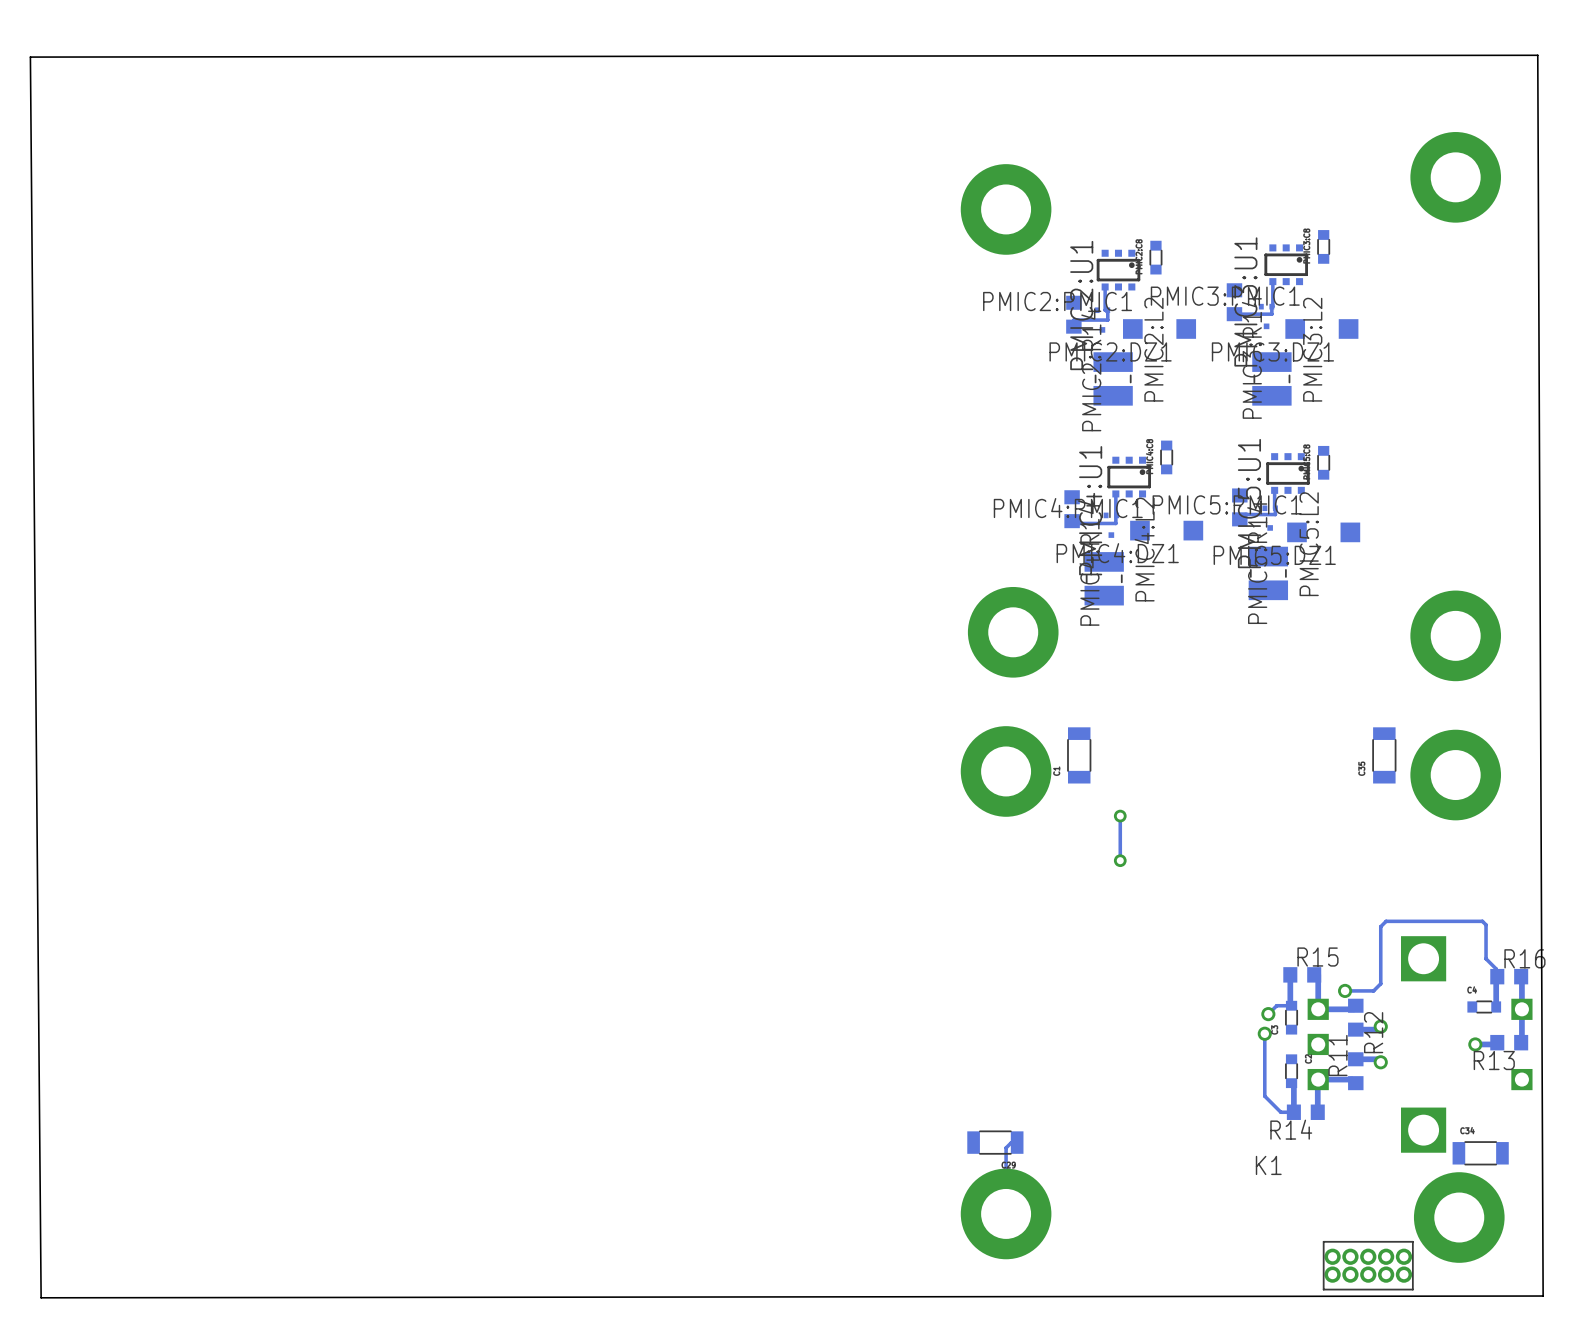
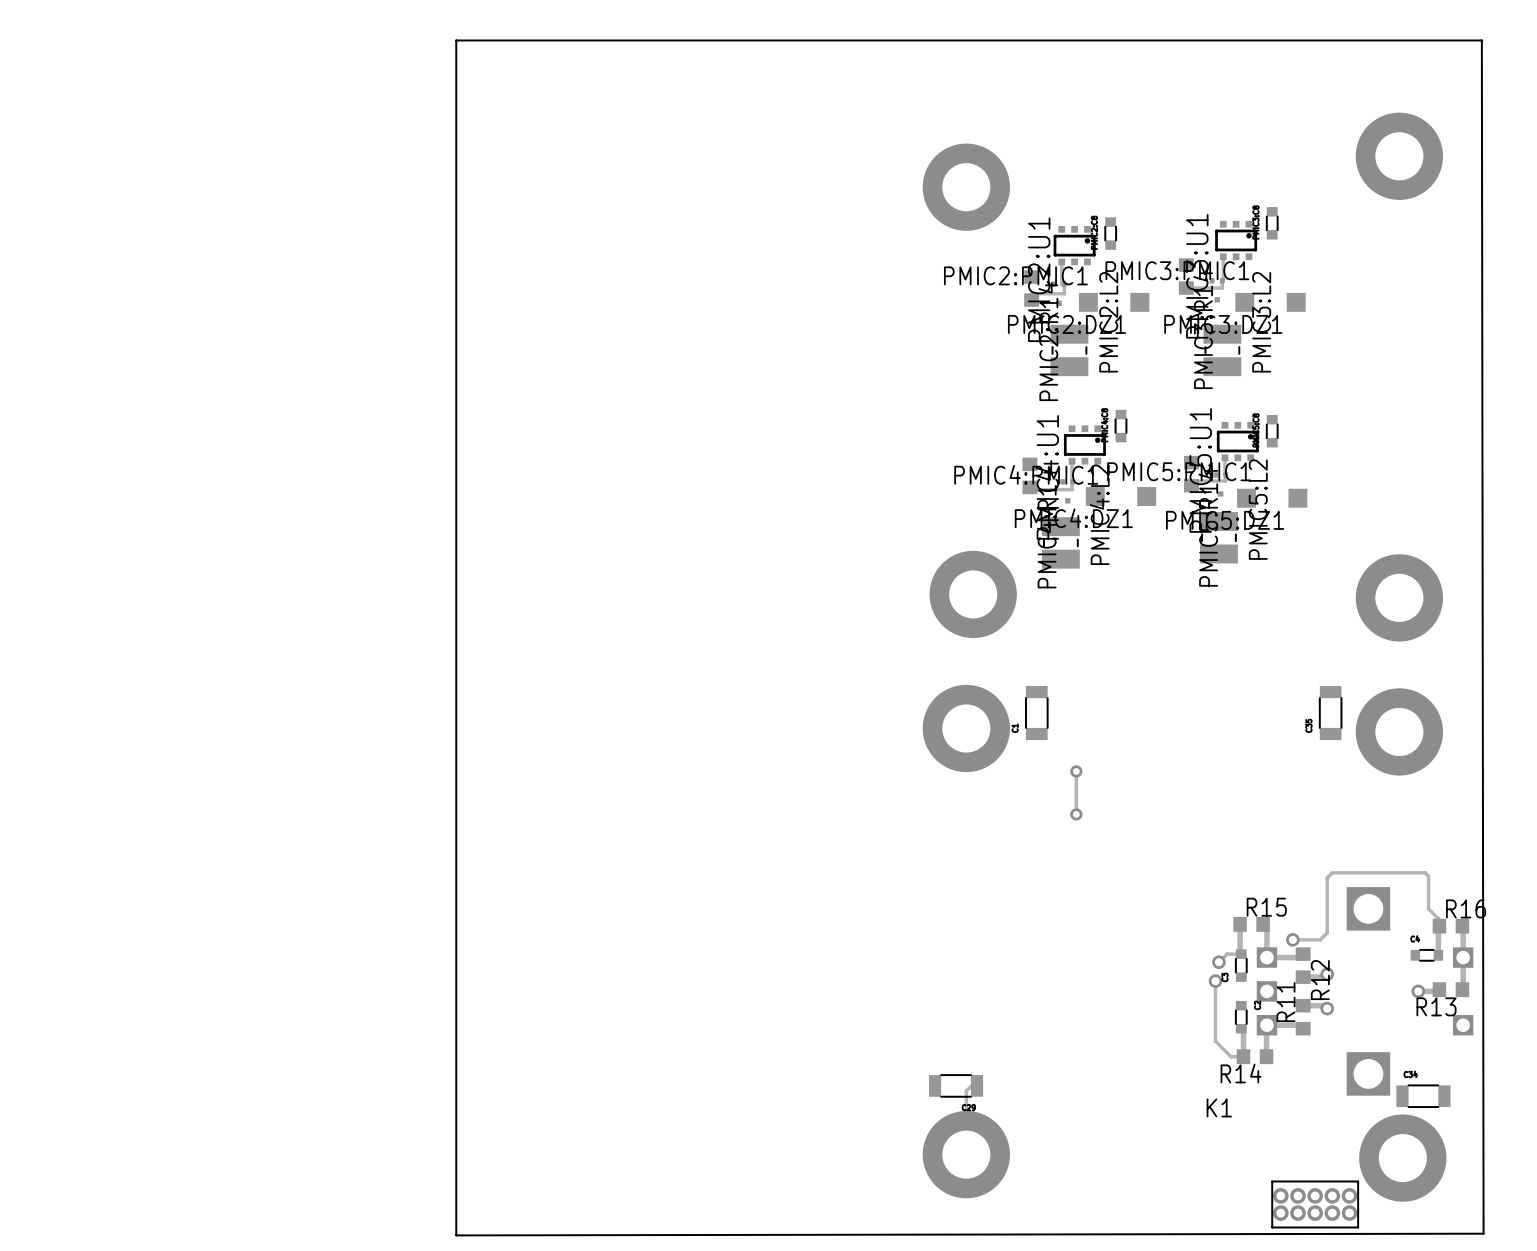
board edge: (1537, 55) (30, 57) (41, 1297) (1543, 1296) (1537, 55) -> (1481, 40) (1483, 1233) (456, 1235) (456, 40) (1481, 40)

